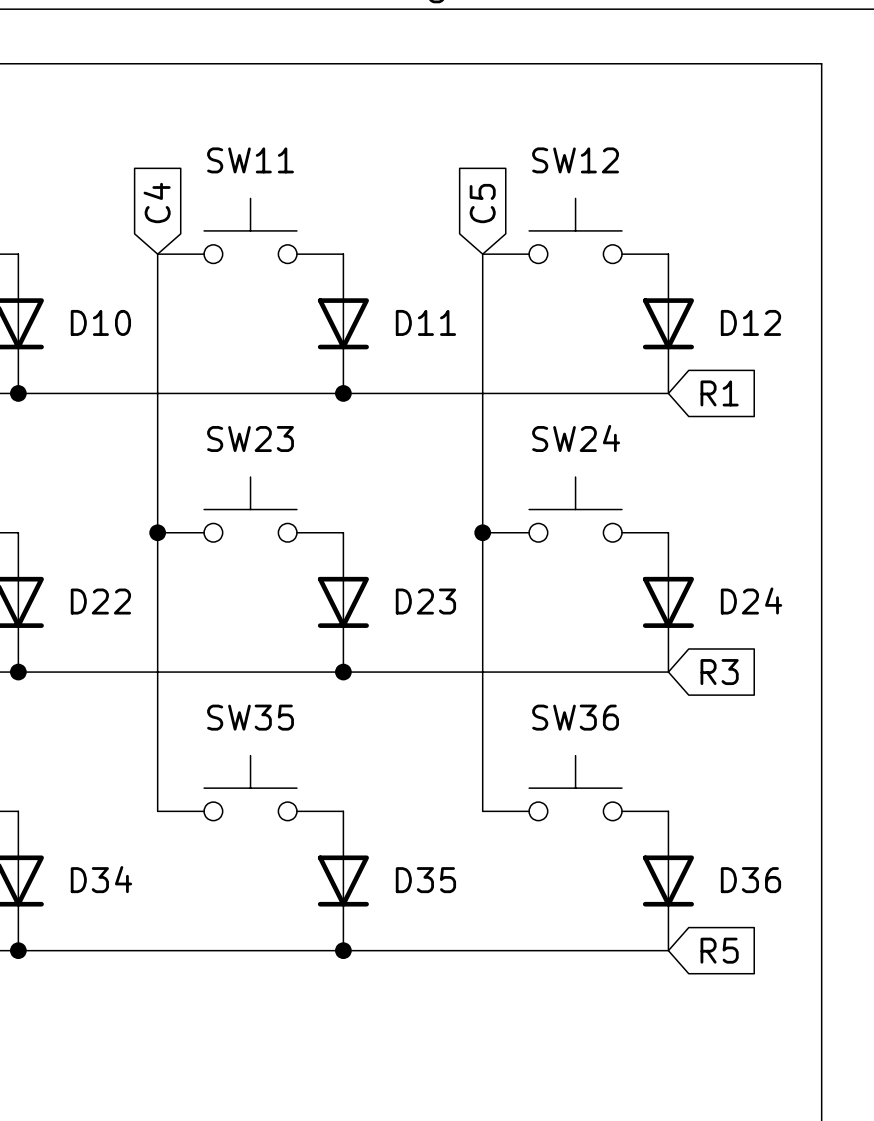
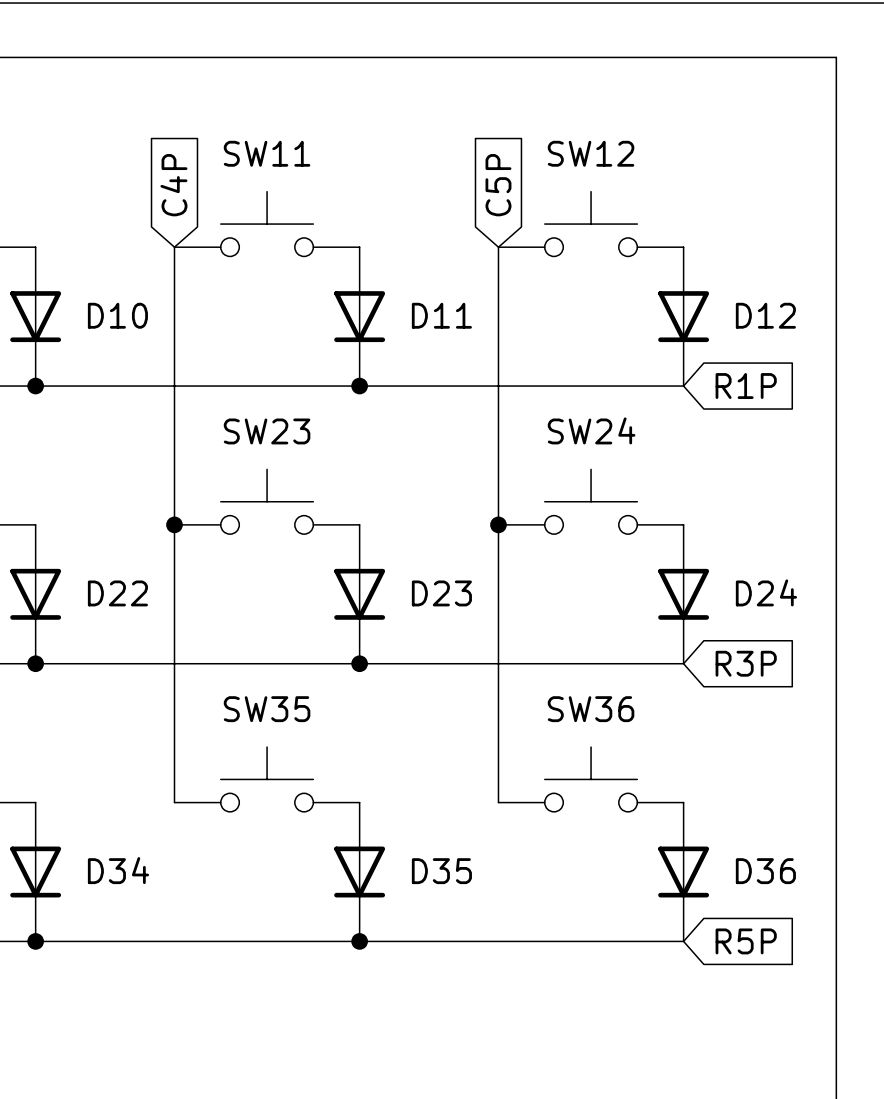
global label: C4 (157, 202) -> C4P (173, 185)
global label: C5 (482, 203) -> C5P (498, 185)
global label: R1 (719, 393) -> R1P (746, 386)
global label: R3 (719, 672) -> R3P (746, 663)
global label: R5 (719, 950) -> R5P (746, 941)

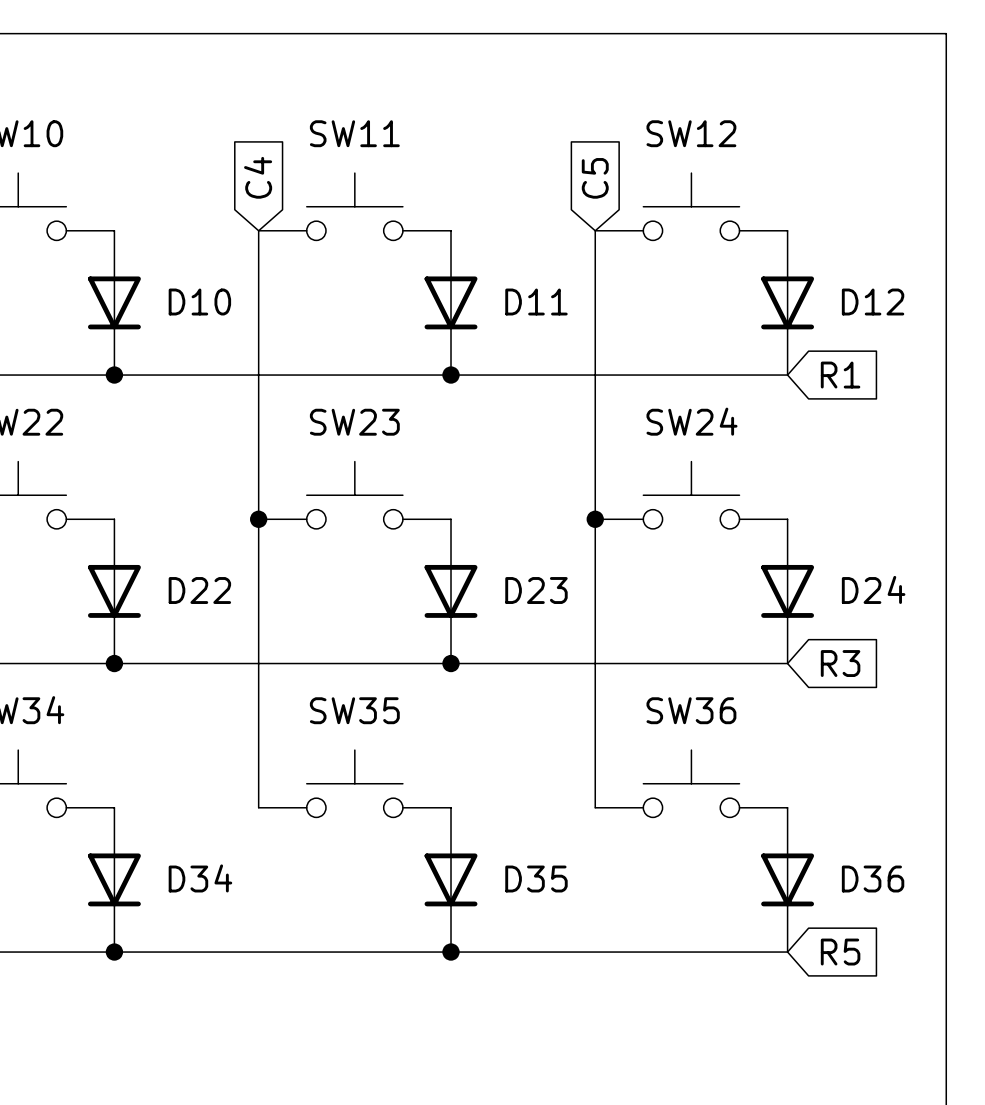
global label: C4P (173, 185) -> C4 (258, 177)
global label: C5P (498, 185) -> C5 (595, 178)
global label: R1P (746, 386) -> R1 (840, 375)
global label: R3P (746, 663) -> R3 (840, 663)
global label: R5P (746, 941) -> R5 (840, 952)

